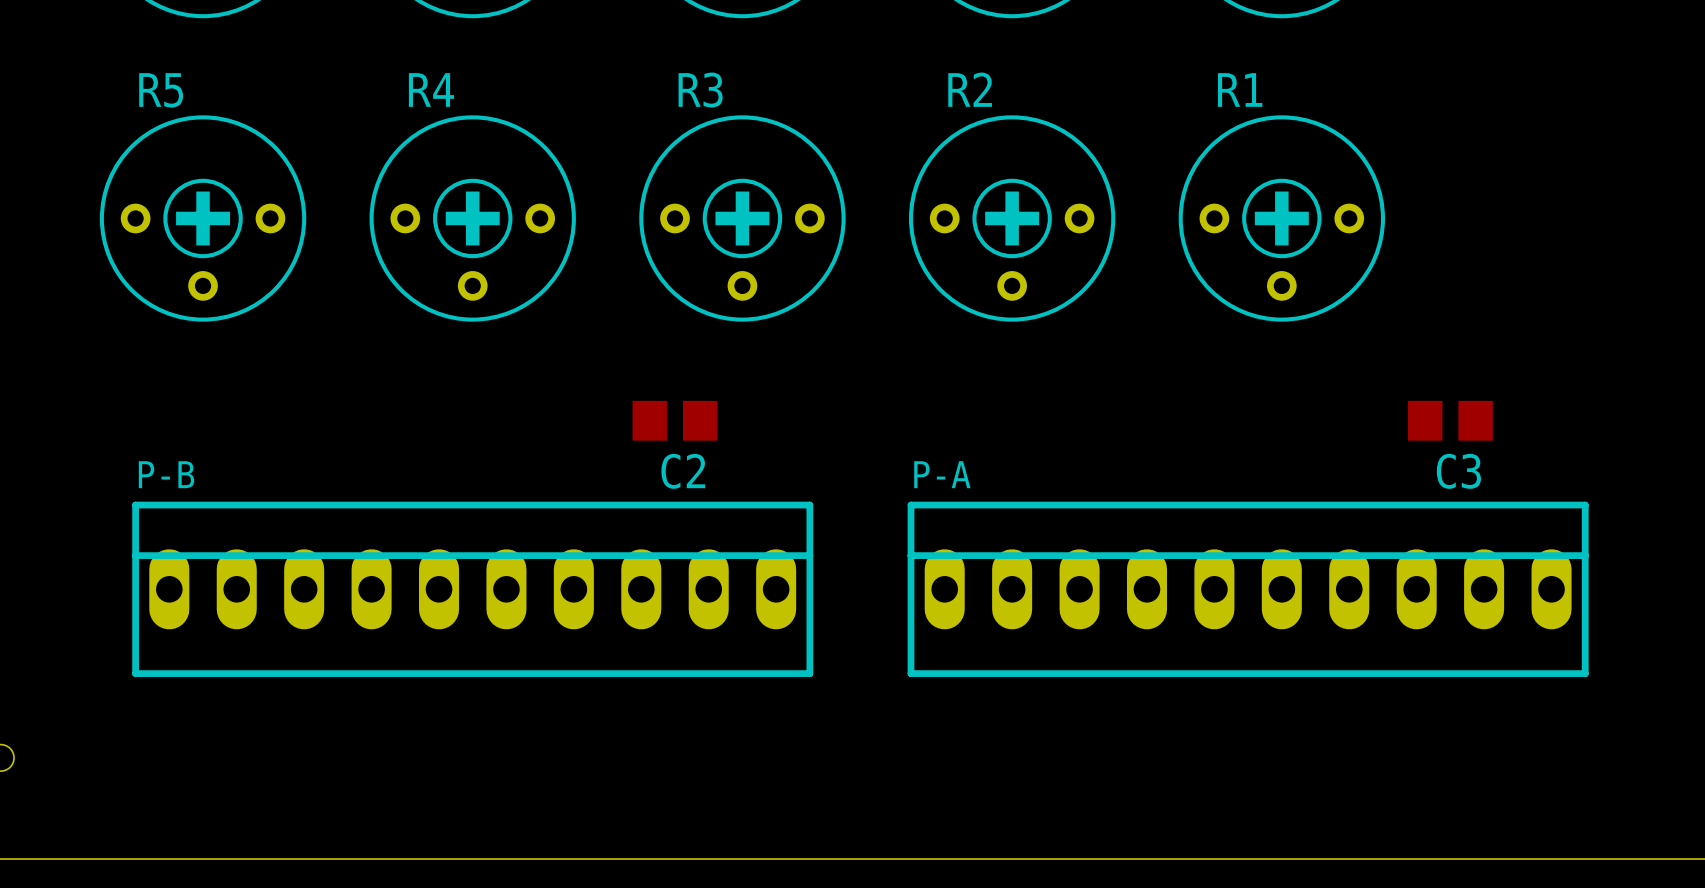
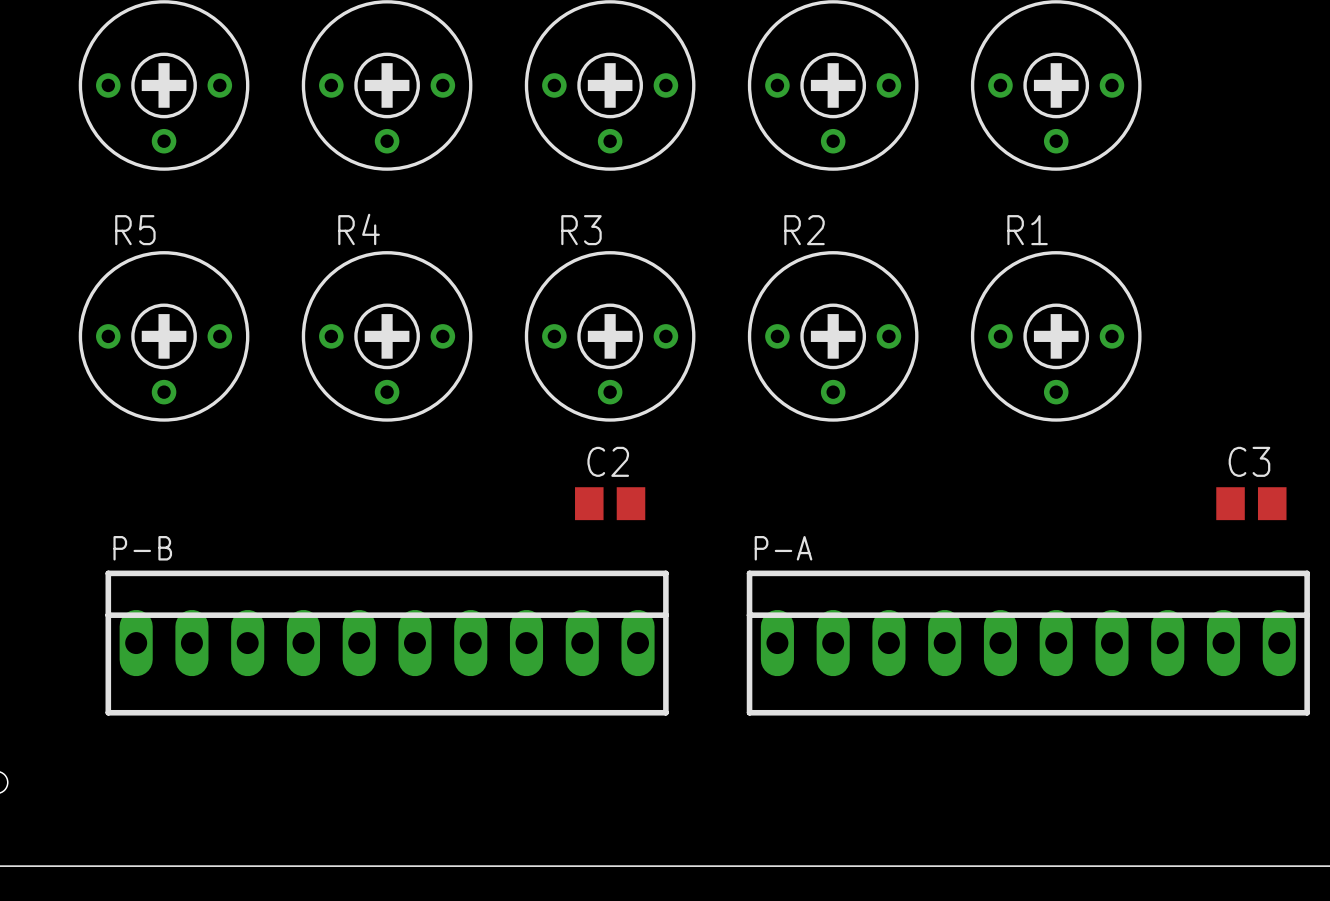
C2 position: (675, 420) -> (610, 503)
C3 position: (1450, 420) -> (1251, 503)
C2 name position: C2 (683, 471) -> C2 (608, 461)
C3 name position: C3 (1458, 471) -> C3 (1249, 461)

